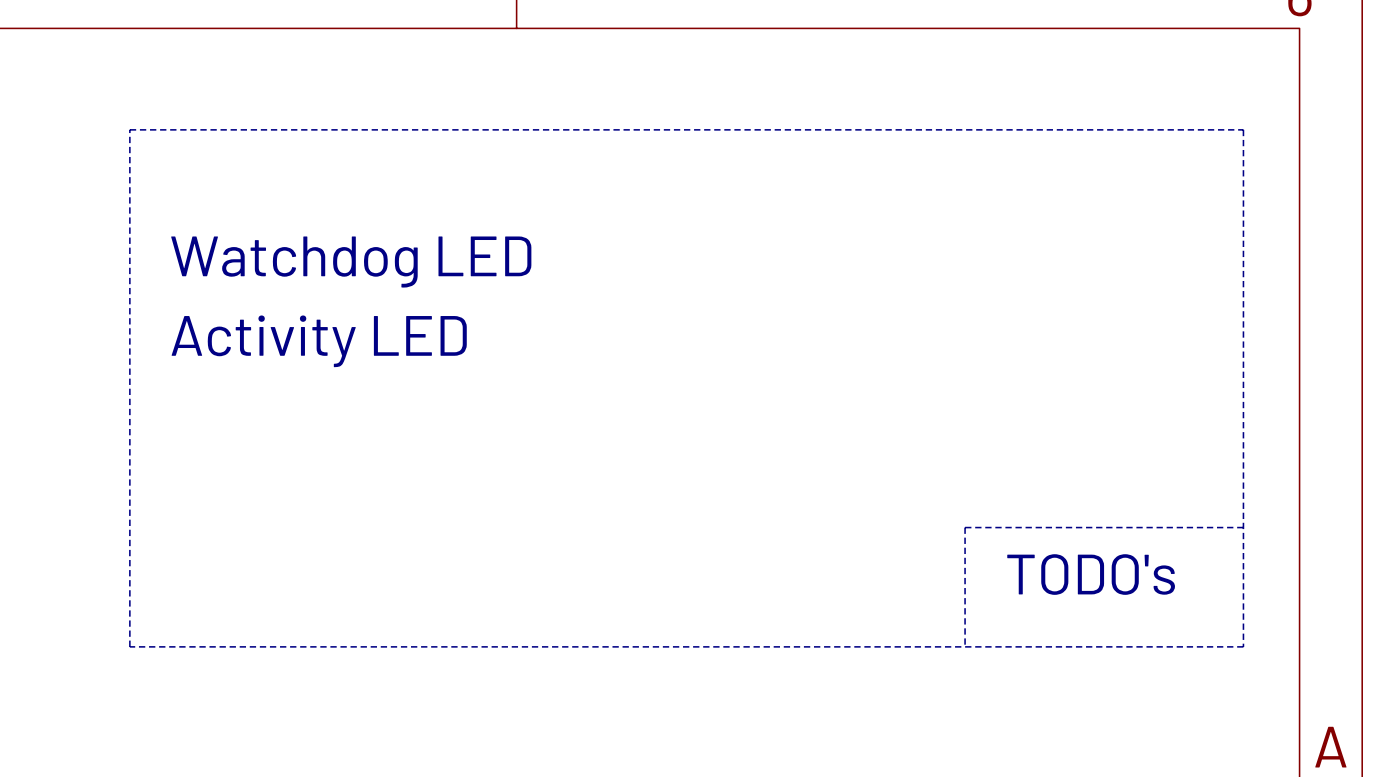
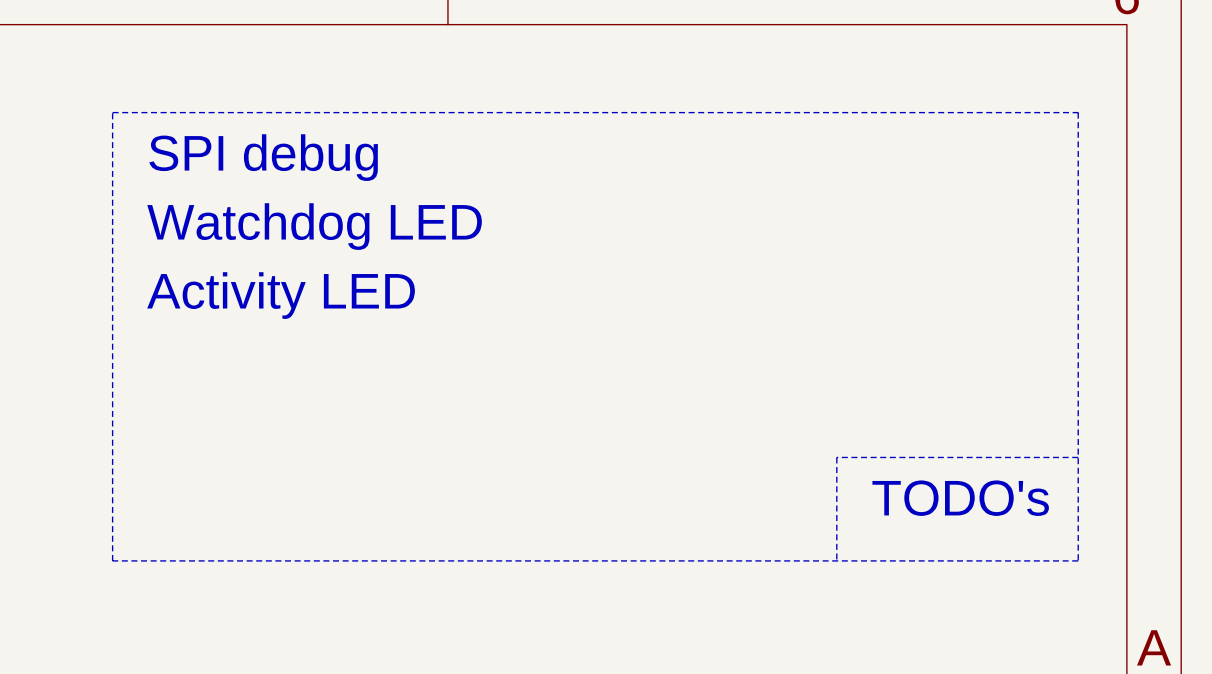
text: none -> SPI debug (263, 157)

